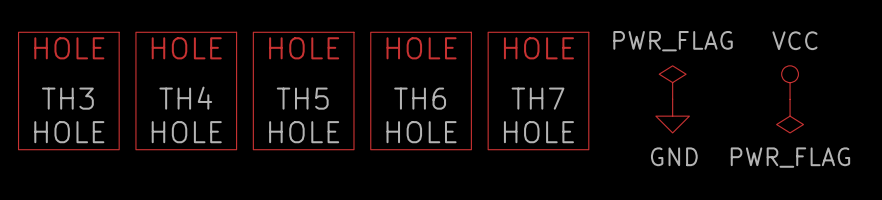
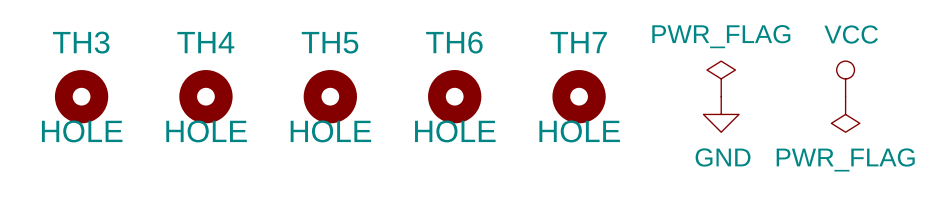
TH3 symbol: [18, 32, 120, 150] -> [54, 70, 109, 124]
TH4 symbol: [135, 32, 237, 150] -> [179, 70, 233, 124]
TH5 symbol: [253, 32, 354, 150] -> [303, 70, 357, 124]
TH6 symbol: [370, 32, 472, 150] -> [428, 70, 482, 124]
TH7 symbol: [488, 32, 589, 150] -> [552, 70, 606, 124]
TH3 name position: TH3 (67, 98) -> TH3 (81, 42)
TH4 name position: TH4 (185, 98) -> TH4 (205, 42)
TH5 name position: TH5 (302, 98) -> TH5 (330, 42)
TH6 name position: TH6 (420, 98) -> TH6 (454, 42)
TH7 name position: TH7 (537, 98) -> TH7 (578, 42)

